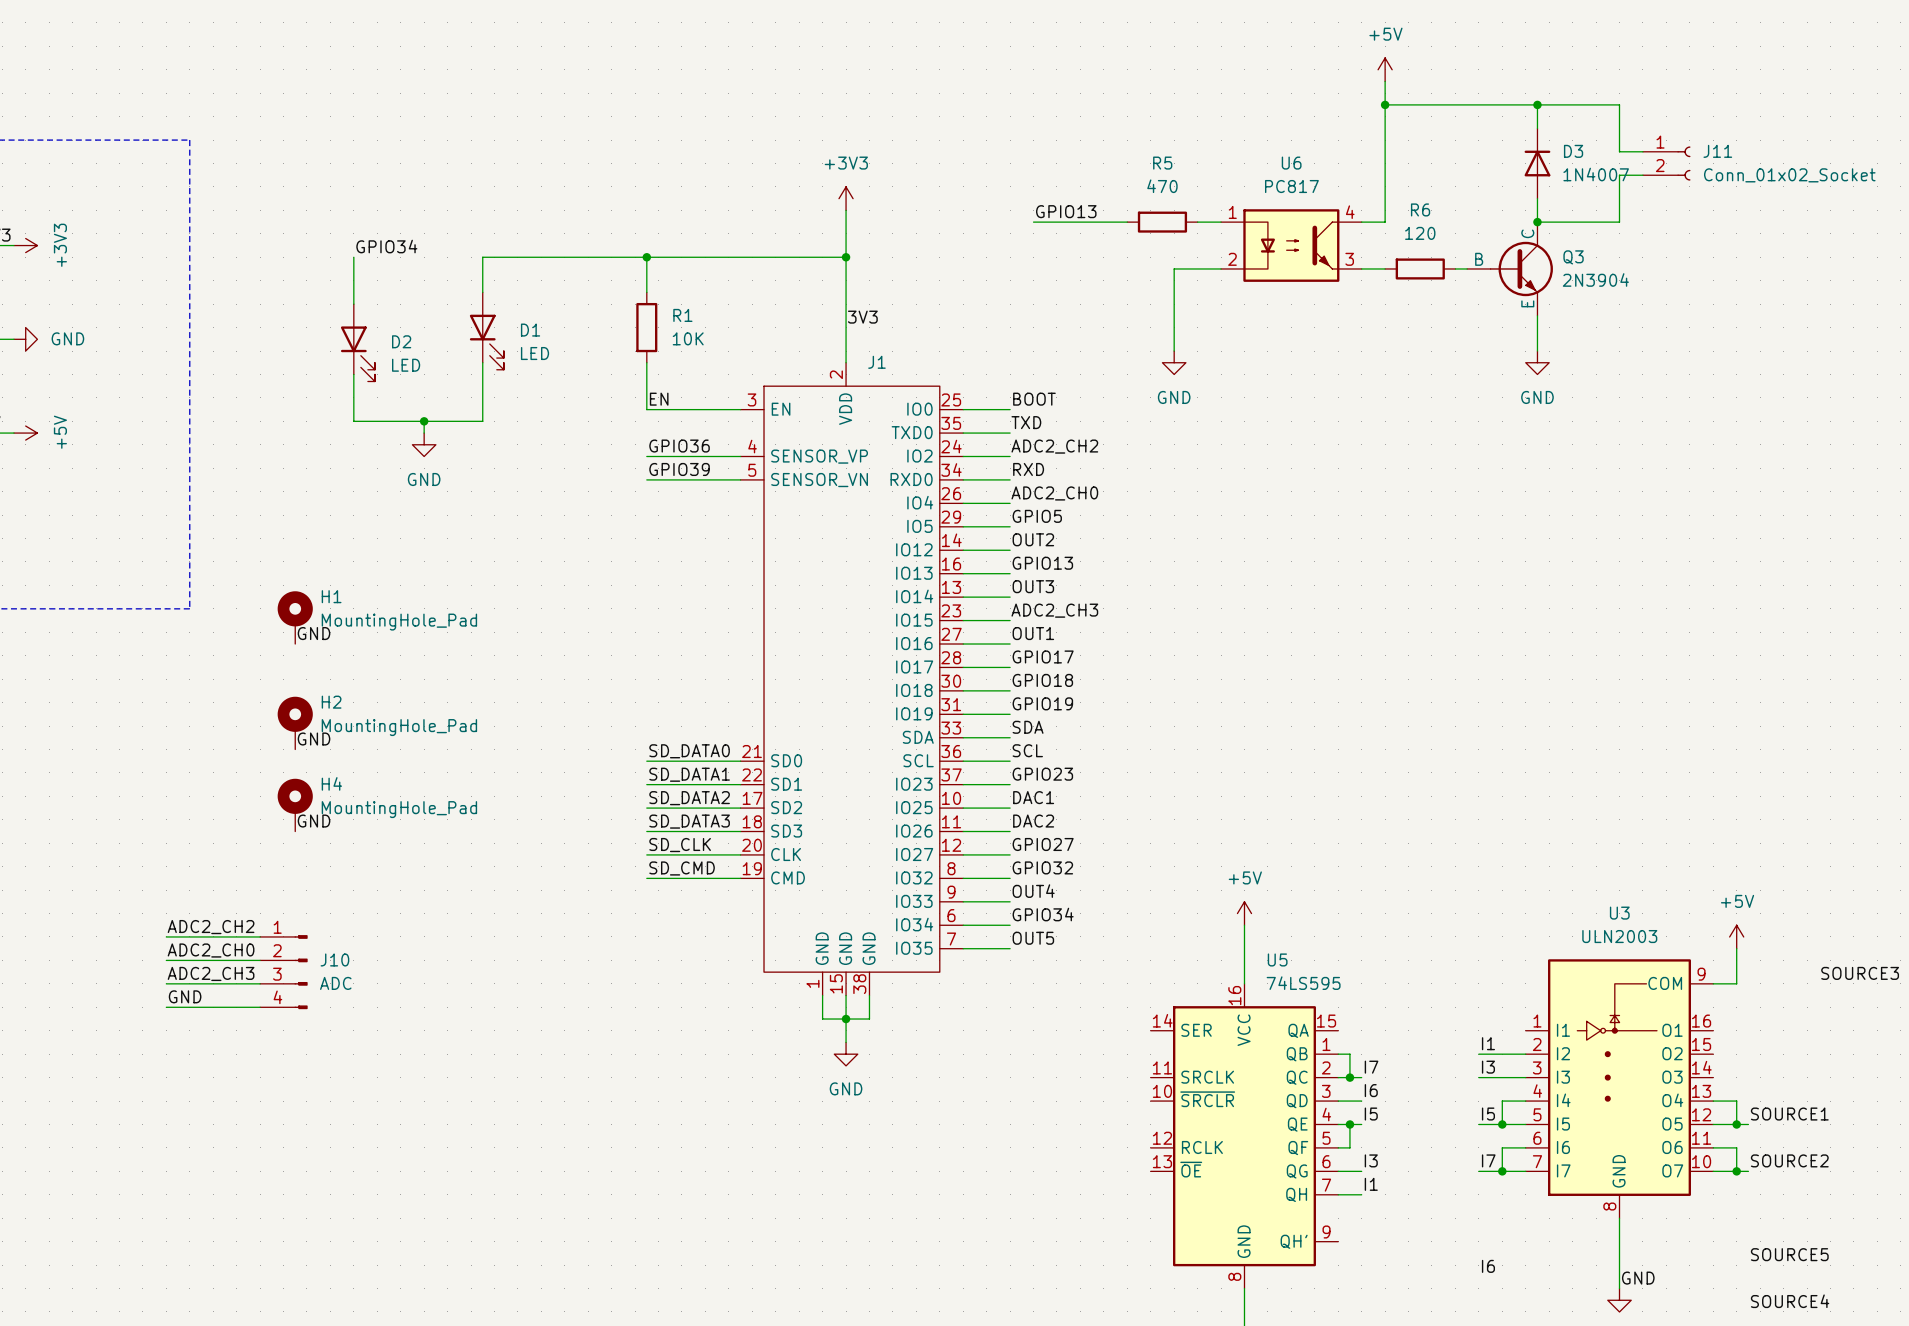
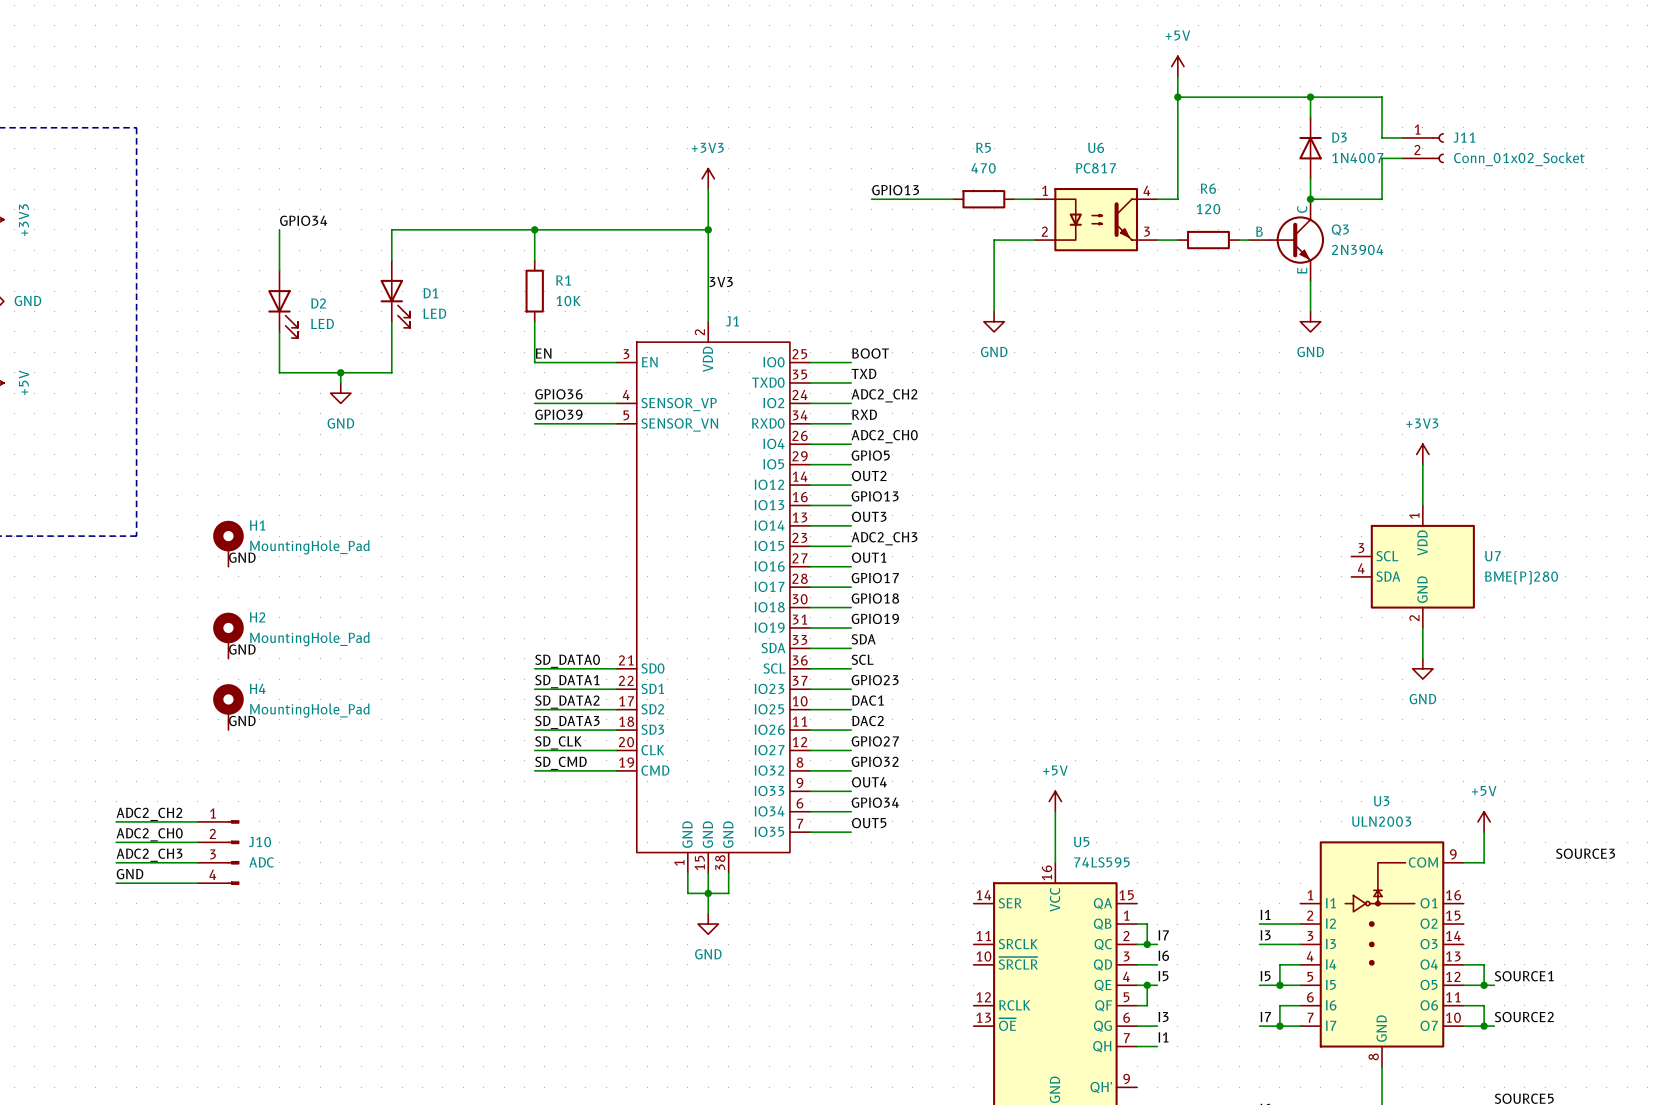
power symbol: none -> +3V3 (1422, 454)
wire: none -> (1422, 464) (1422, 505)
U7: none -> BME(P)280 (1413, 566)
wire: none -> (1422, 627) (1422, 658)
power symbol: none -> GND (1422, 668)

